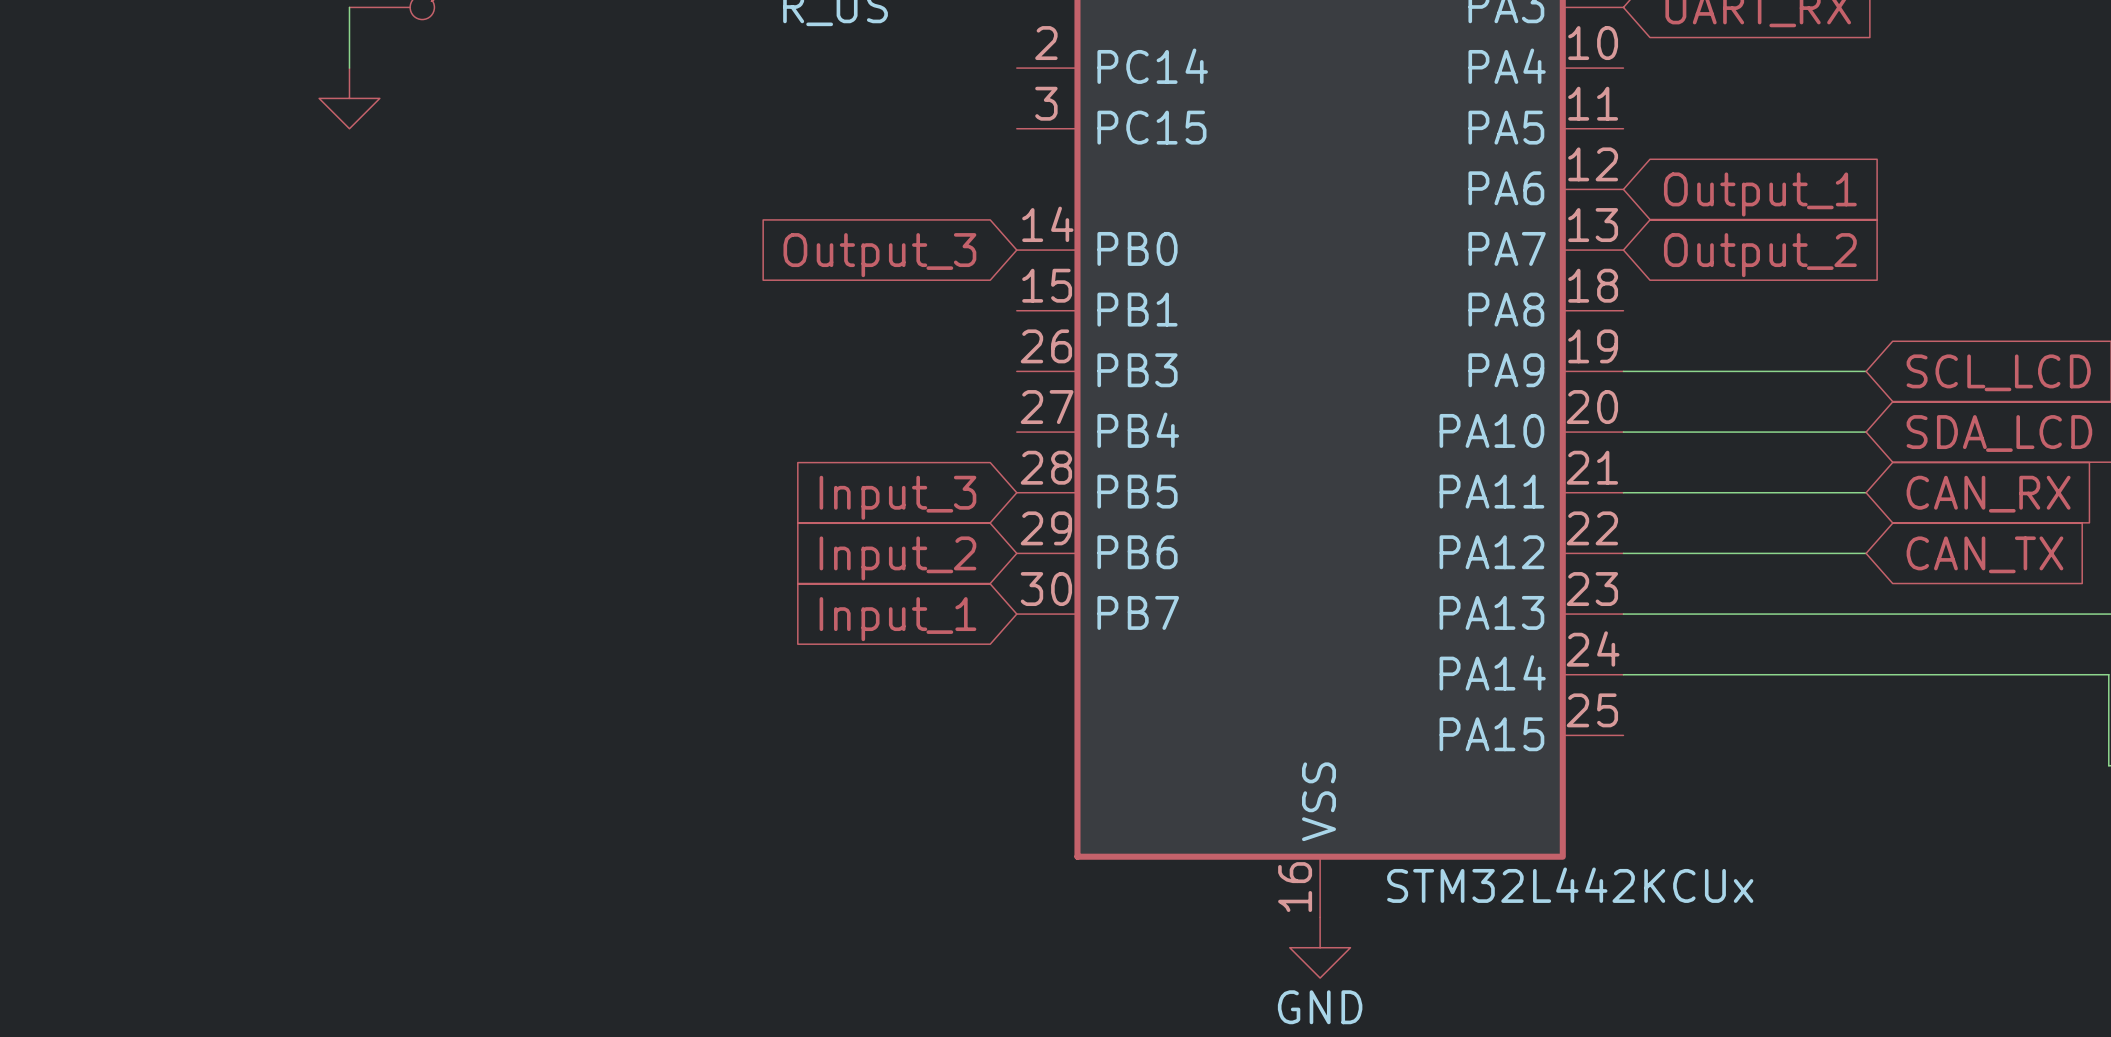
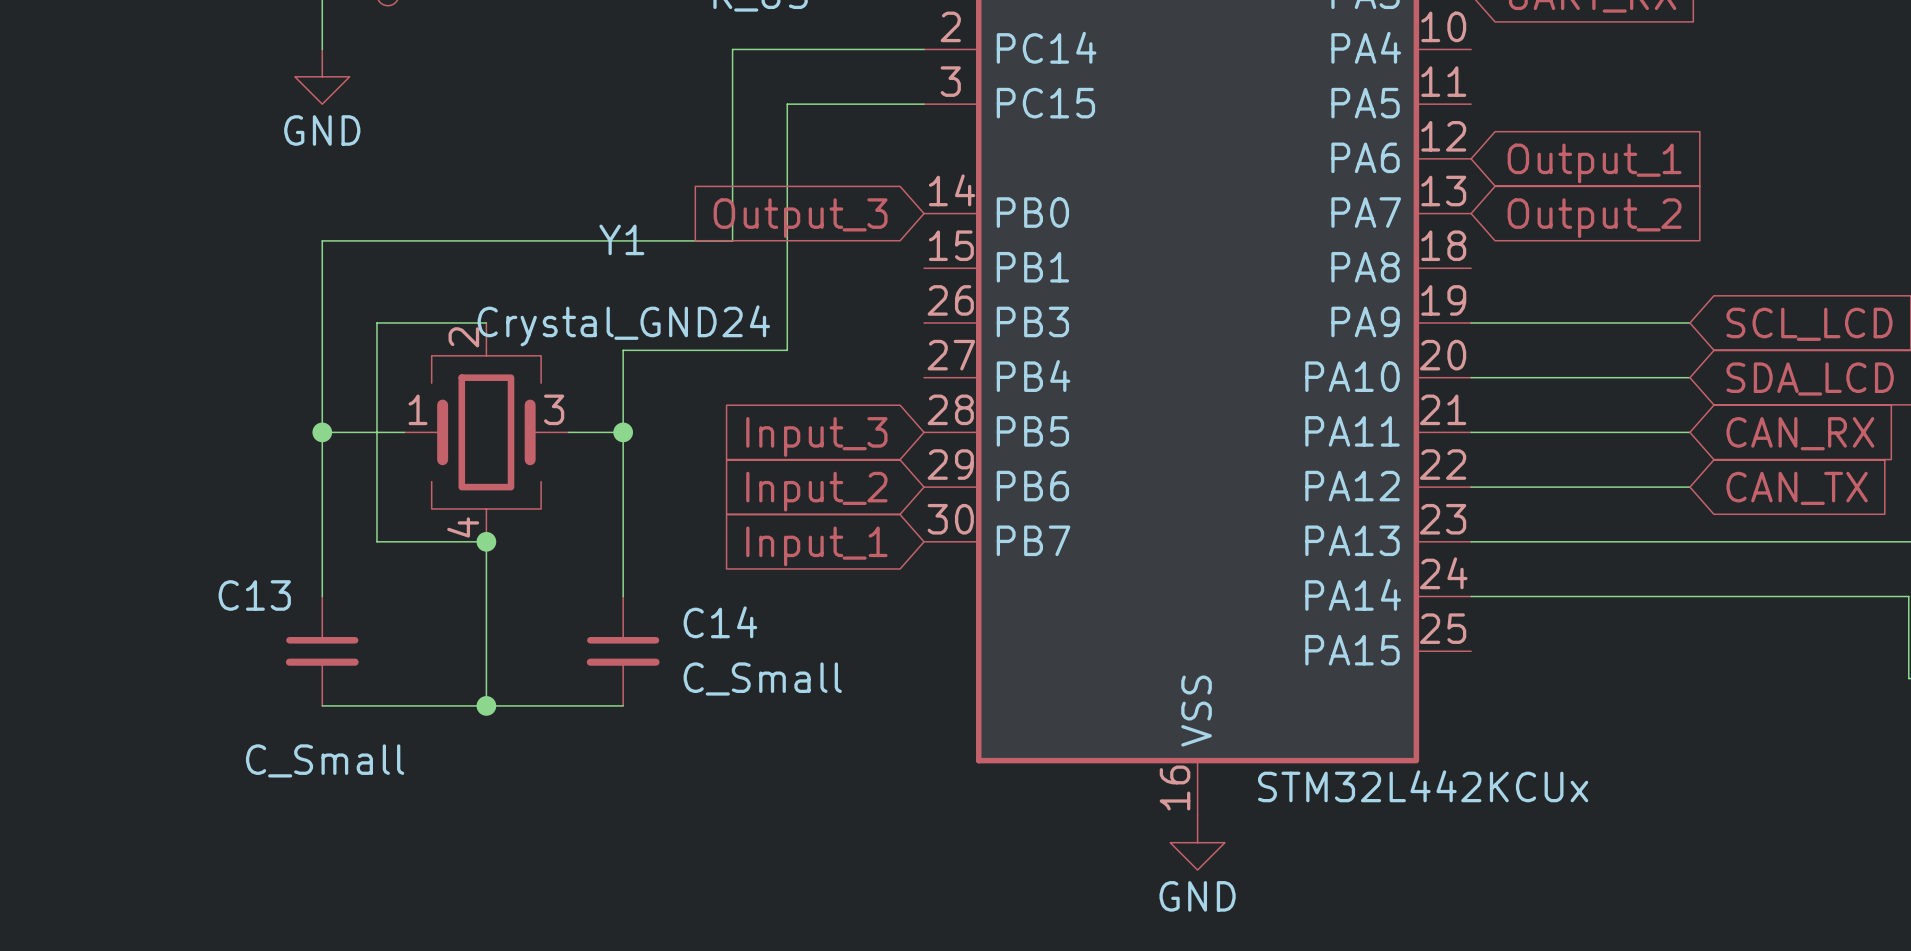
wire: none -> (924, 49) (732, 49) (732, 240) (322, 240) (322, 596)
wire: none -> (924, 104) (787, 104) (787, 350) (623, 350) (623, 596)
power symbol text: none -> GND (322, 130)
wire: none -> (486, 322) (376, 322) (376, 541) (486, 541) (486, 705)
wire: none -> (322, 432) (404, 432)
junction: none -> (322, 432)
Y1: none -> Crystal_GND24 (486, 432)
wire: none -> (568, 432) (623, 432)
junction: none -> (623, 432)
junction: none -> (486, 541)
C13: none -> C_Small (322, 651)
C14: none -> C_Small (623, 651)
wire: none -> (322, 705) (623, 705)
junction: none -> (486, 705)

